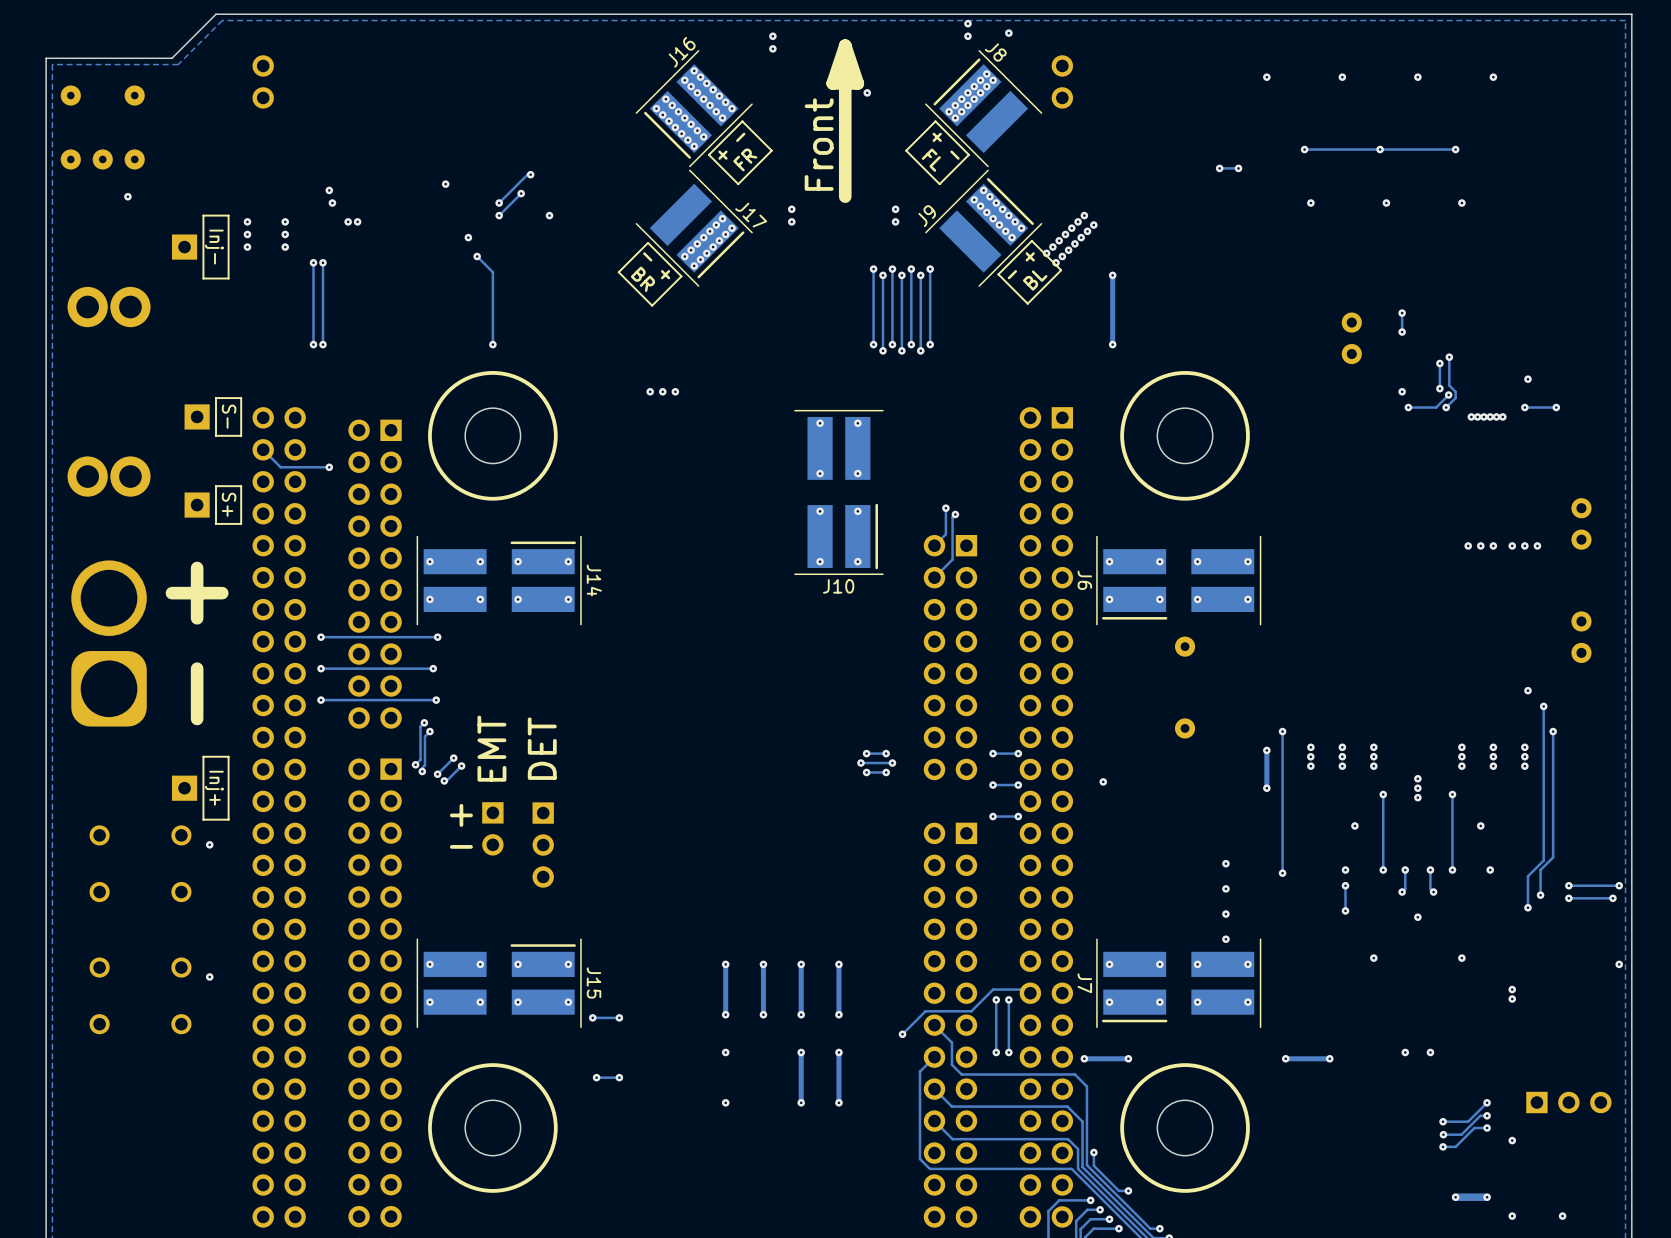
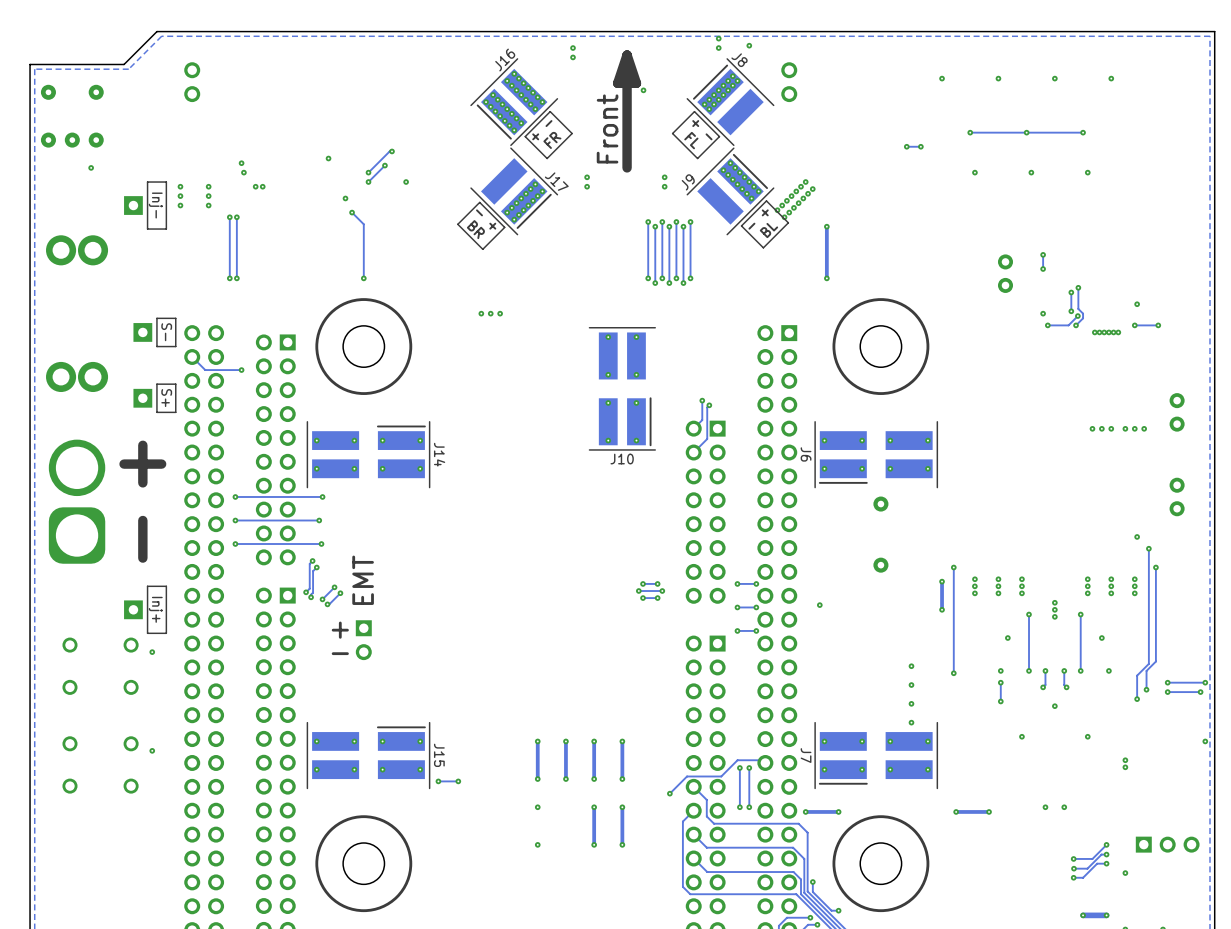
text: DET (542, 748) -> none
part: (543, 845) -> none
via: (596, 1077) -> none
track: (619, 1077) (596, 1077) -> none
via: (619, 1077) -> none

